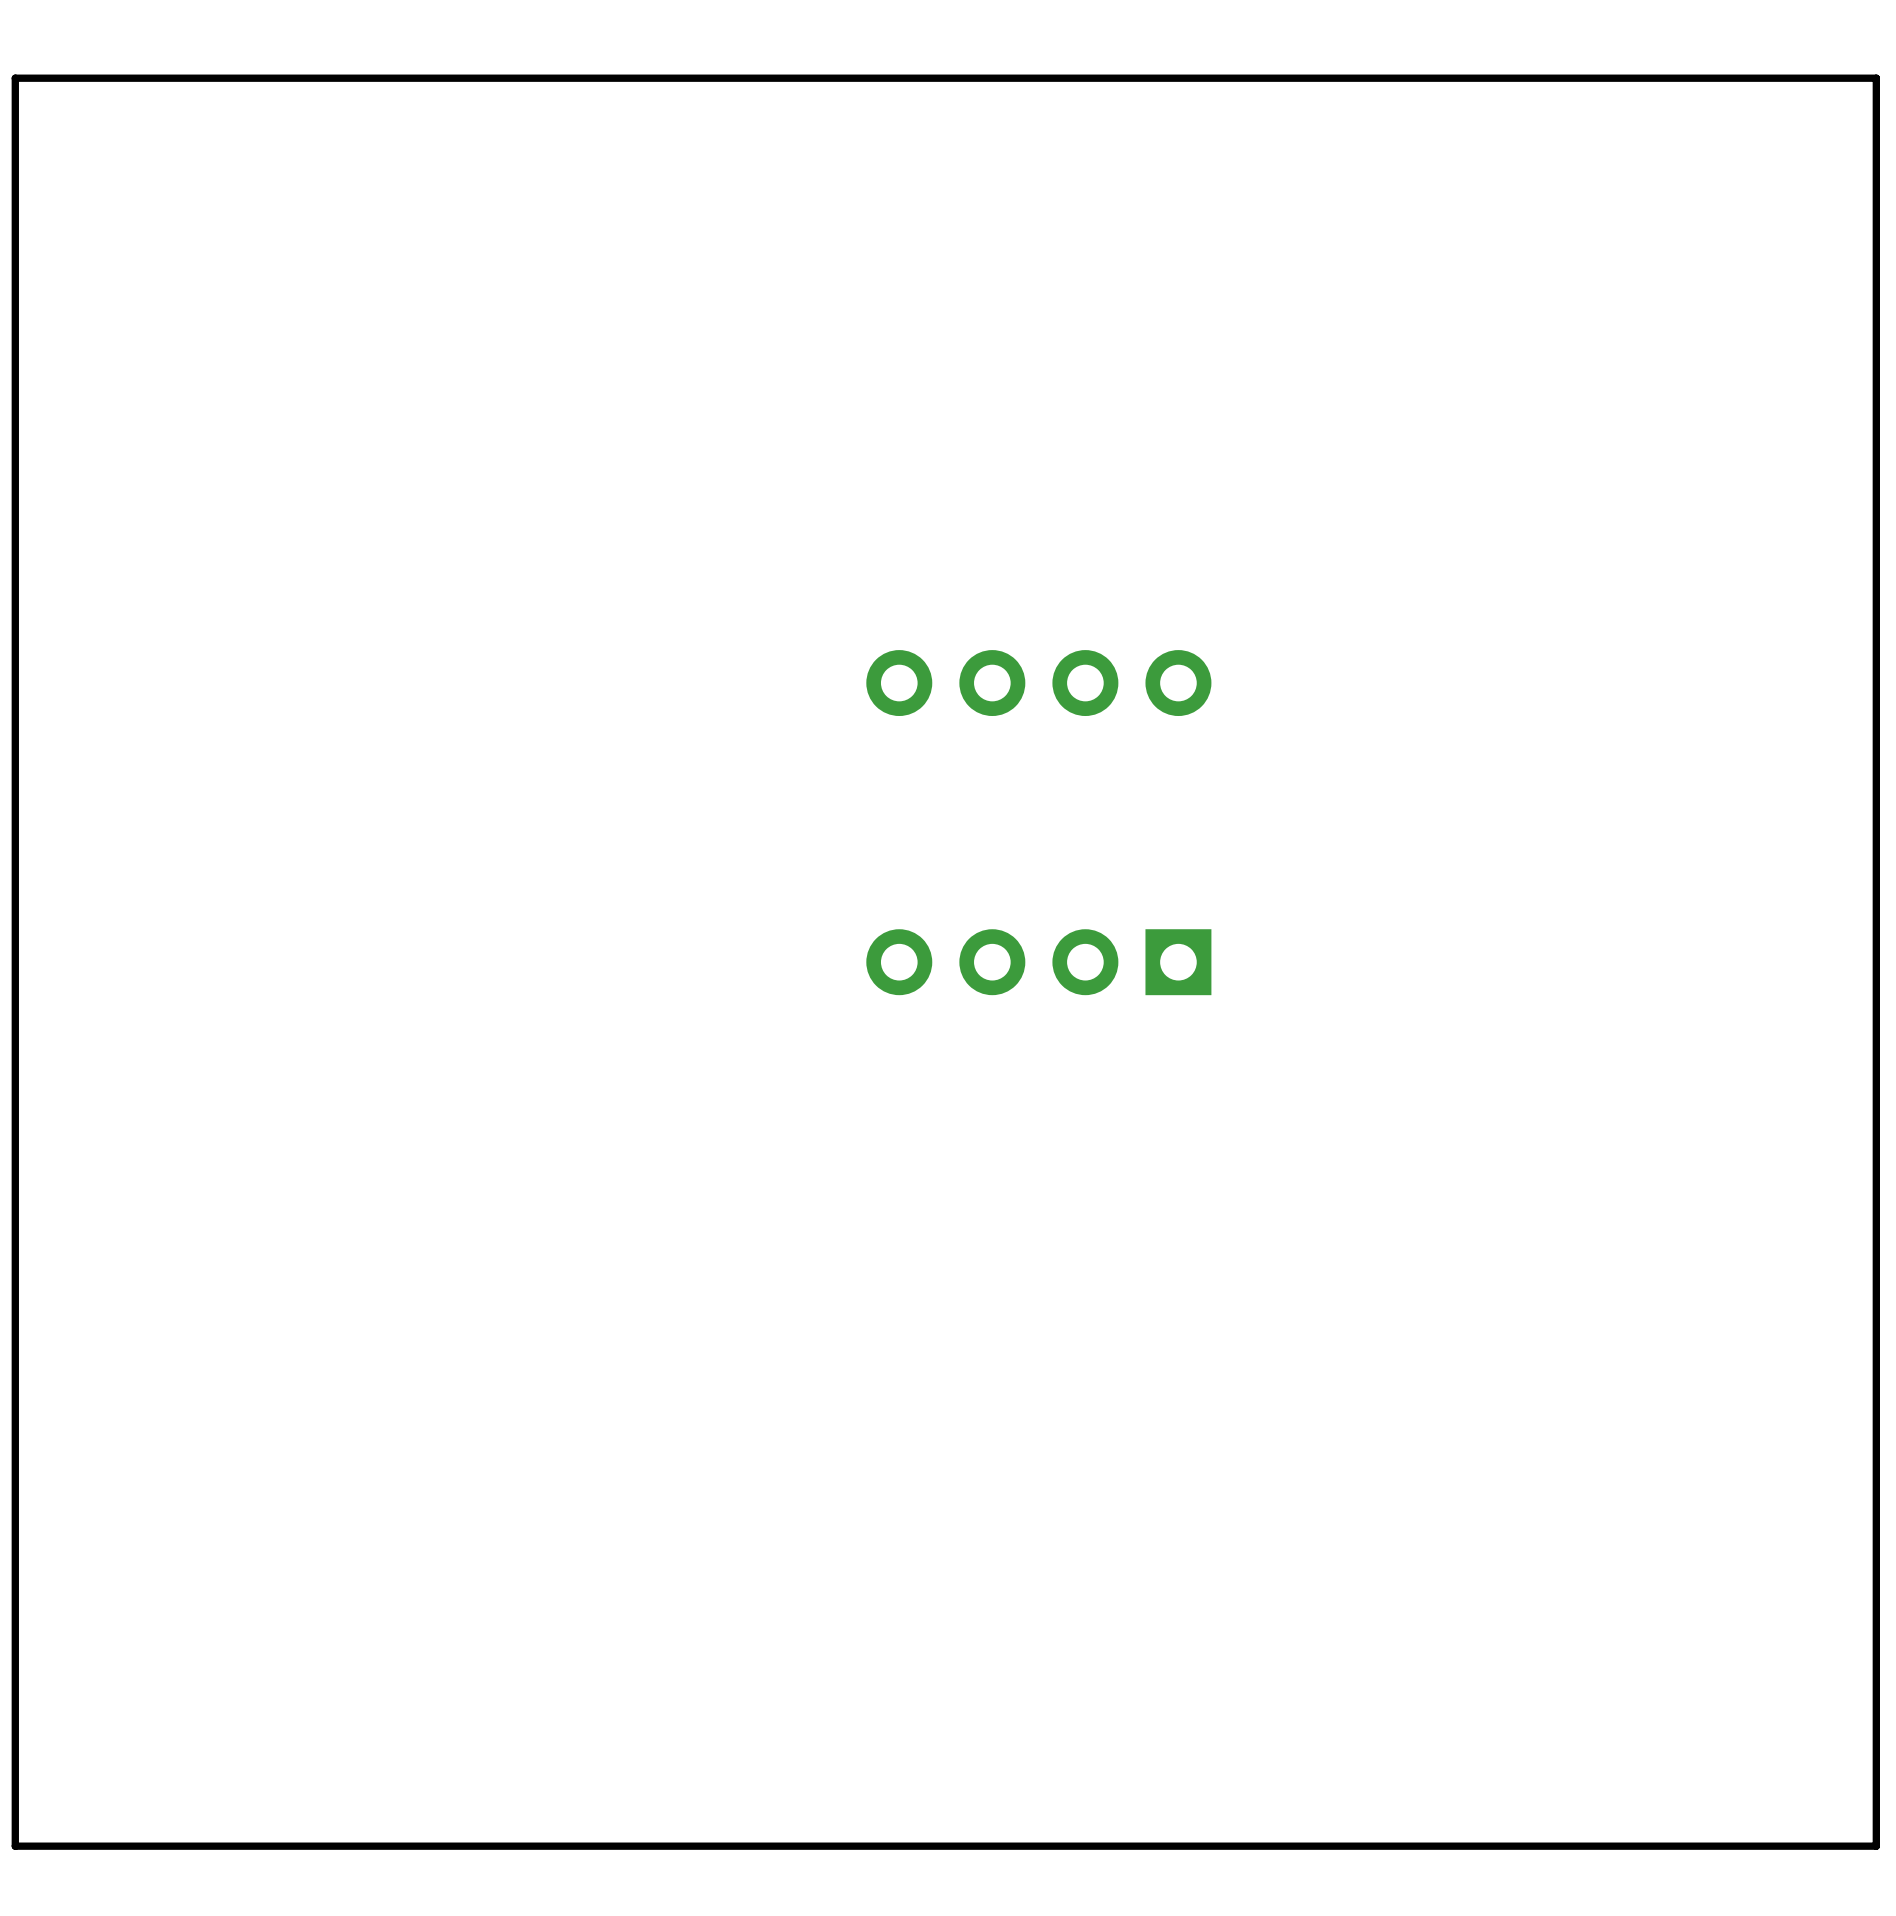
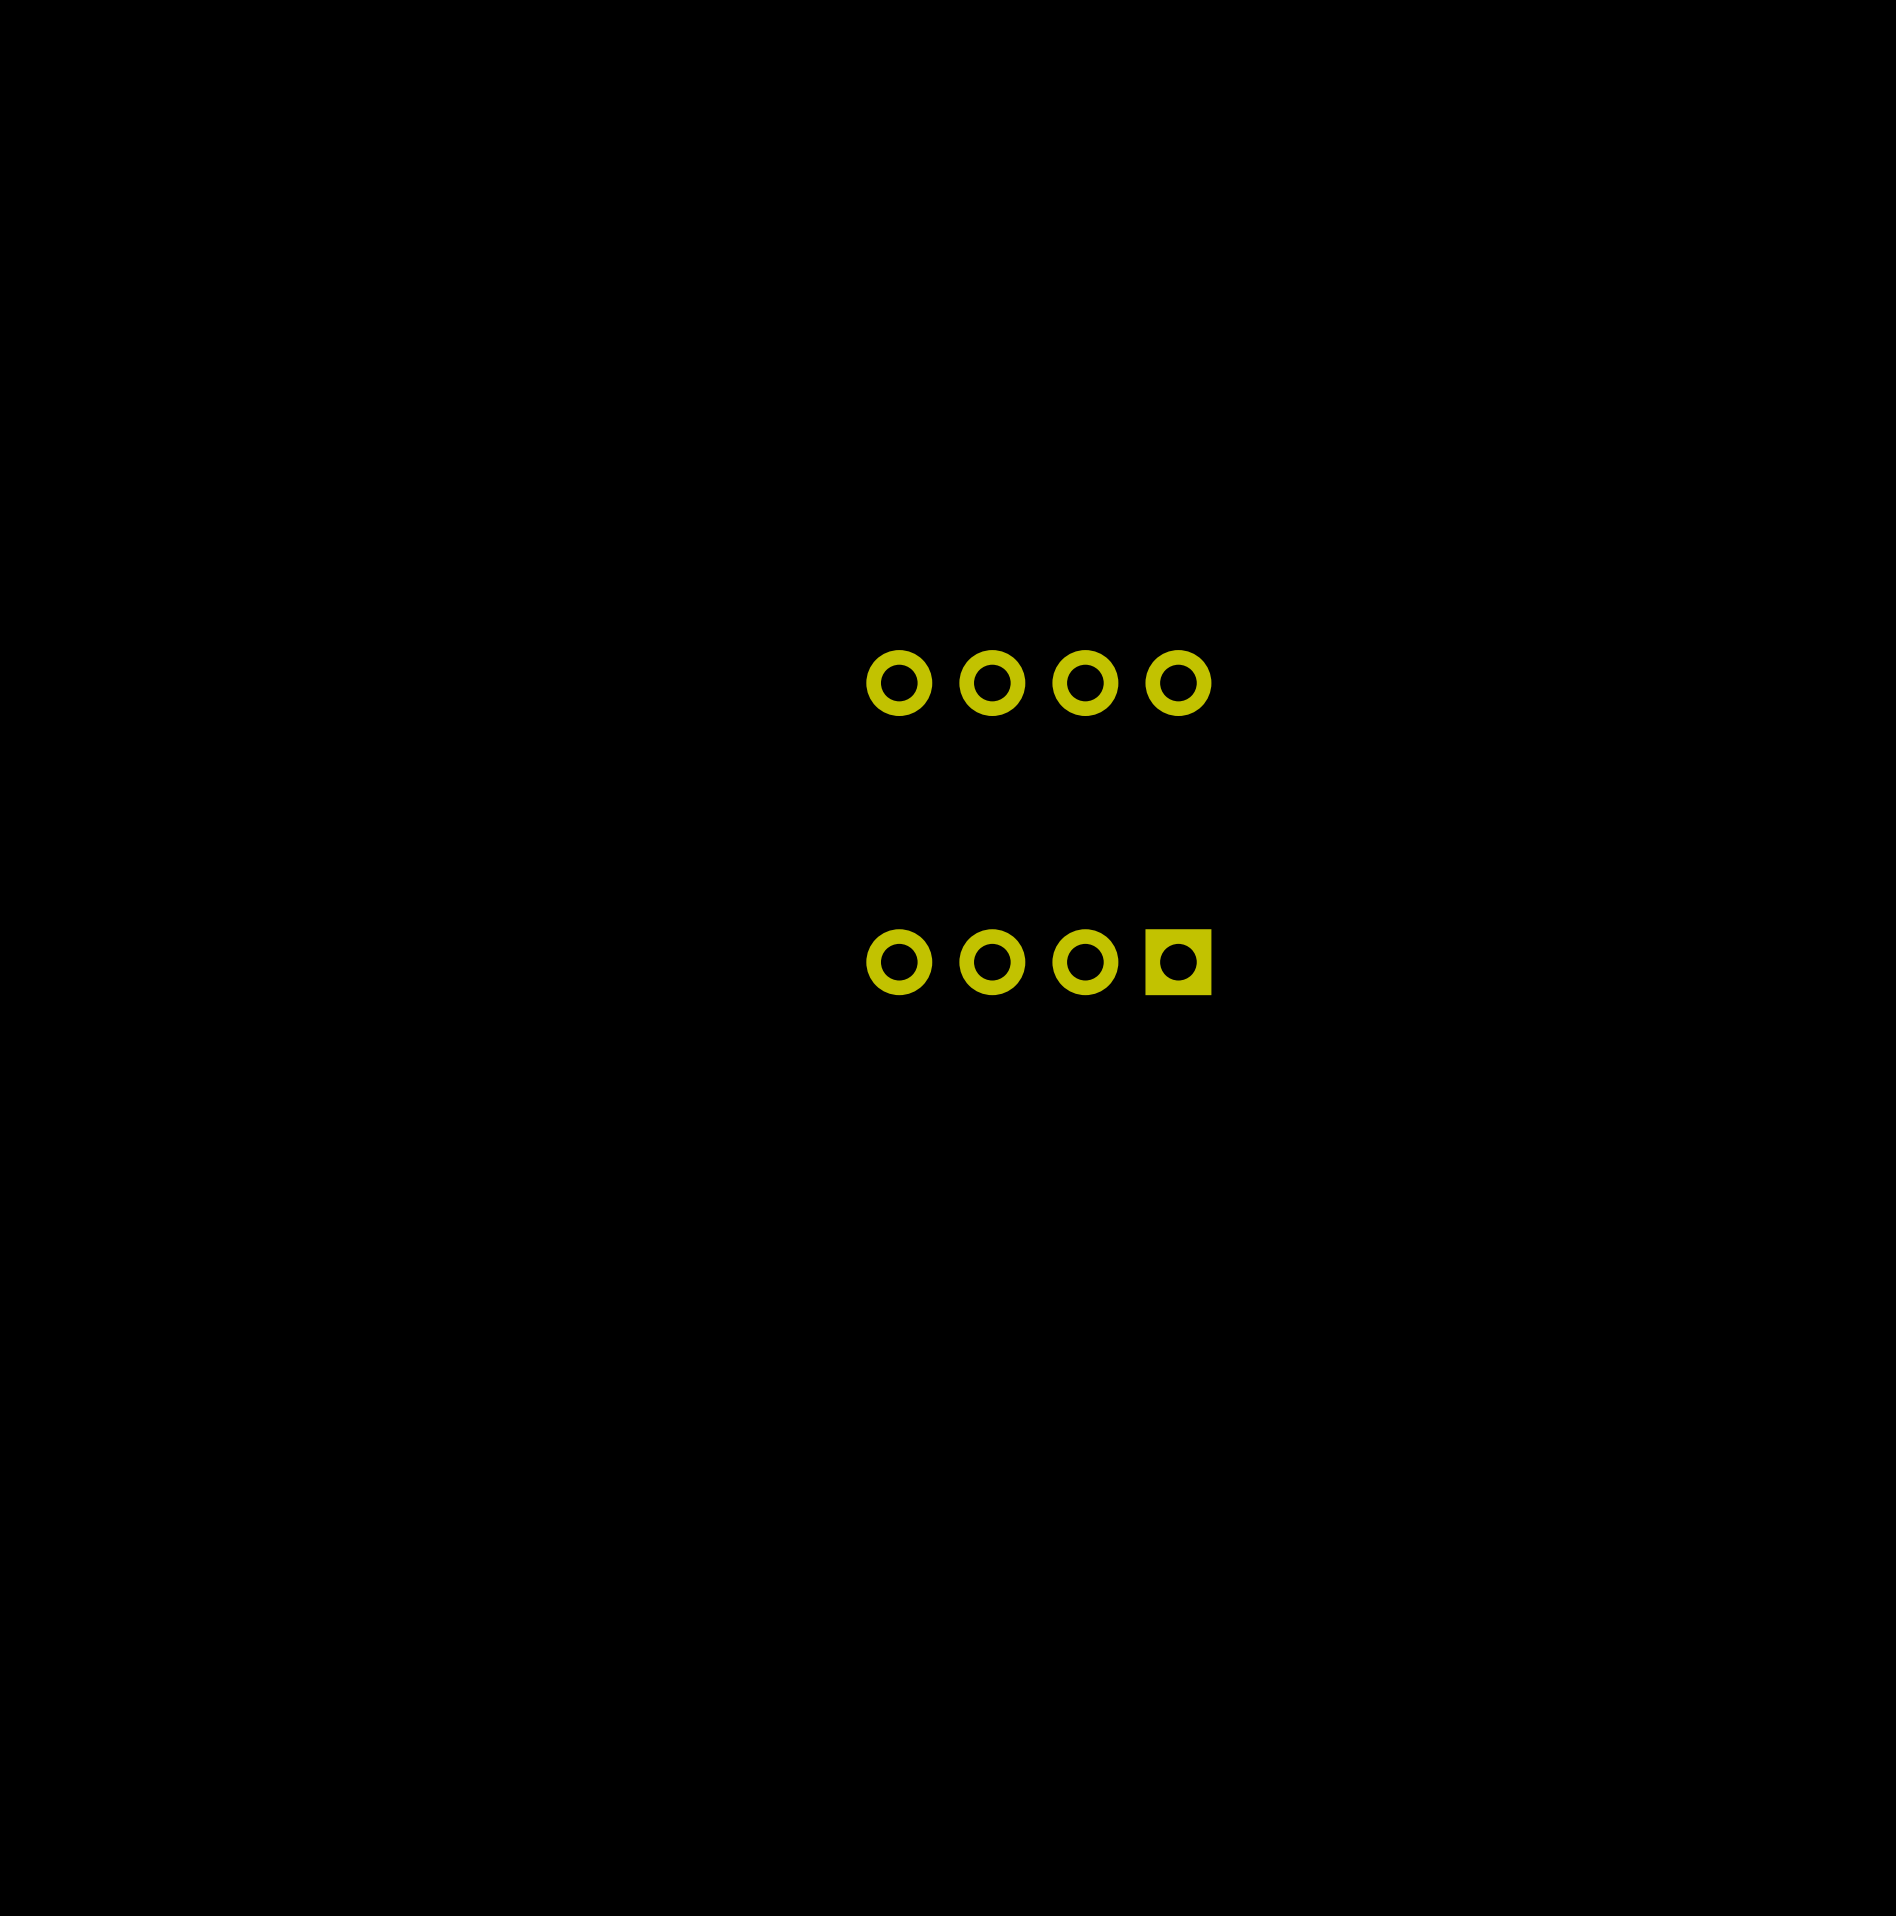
board edge: (1876, 78) (15, 78) (15, 1846) (1876, 1846) (1876, 78) -> none

